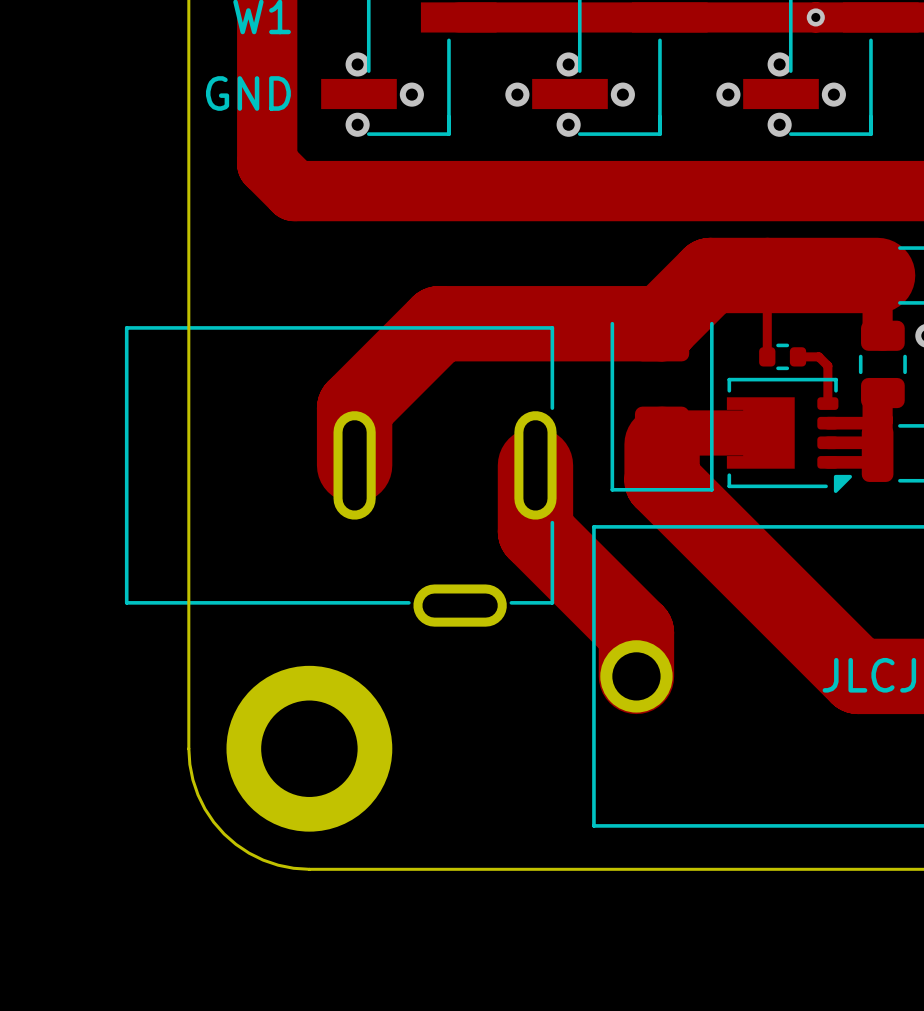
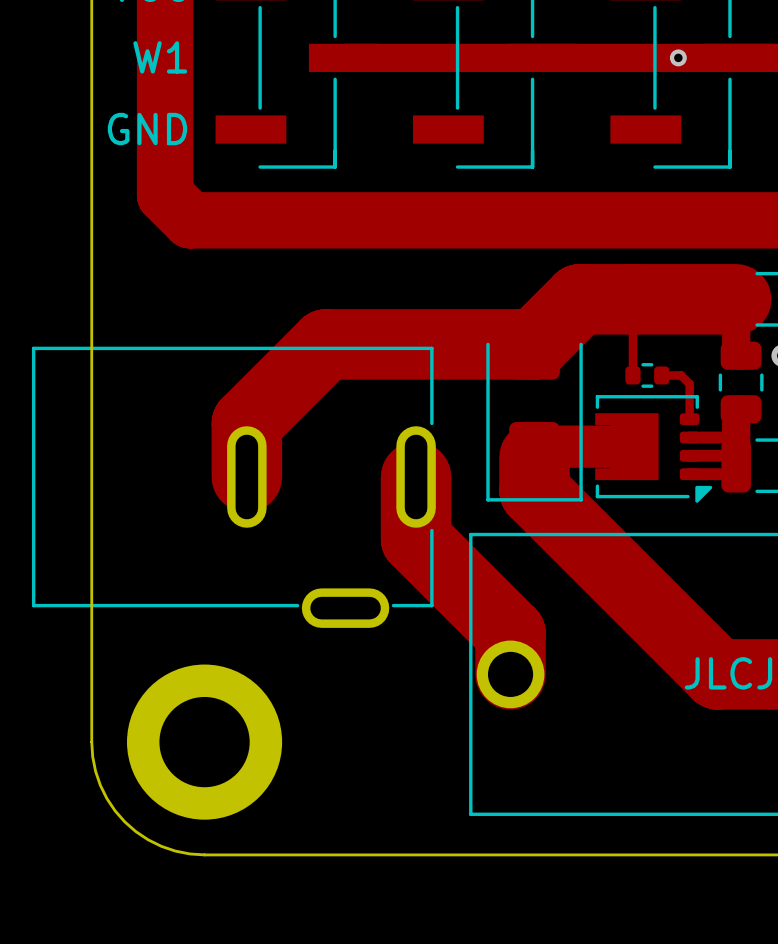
via: (357, 64) -> none
via: (568, 64) -> none
via: (779, 64) -> none
via: (411, 94) -> none
via: (517, 94) -> none
via: (622, 94) -> none
via: (728, 94) -> none
via: (833, 94) -> none
via: (357, 124) -> none
via: (568, 124) -> none
via: (779, 124) -> none

